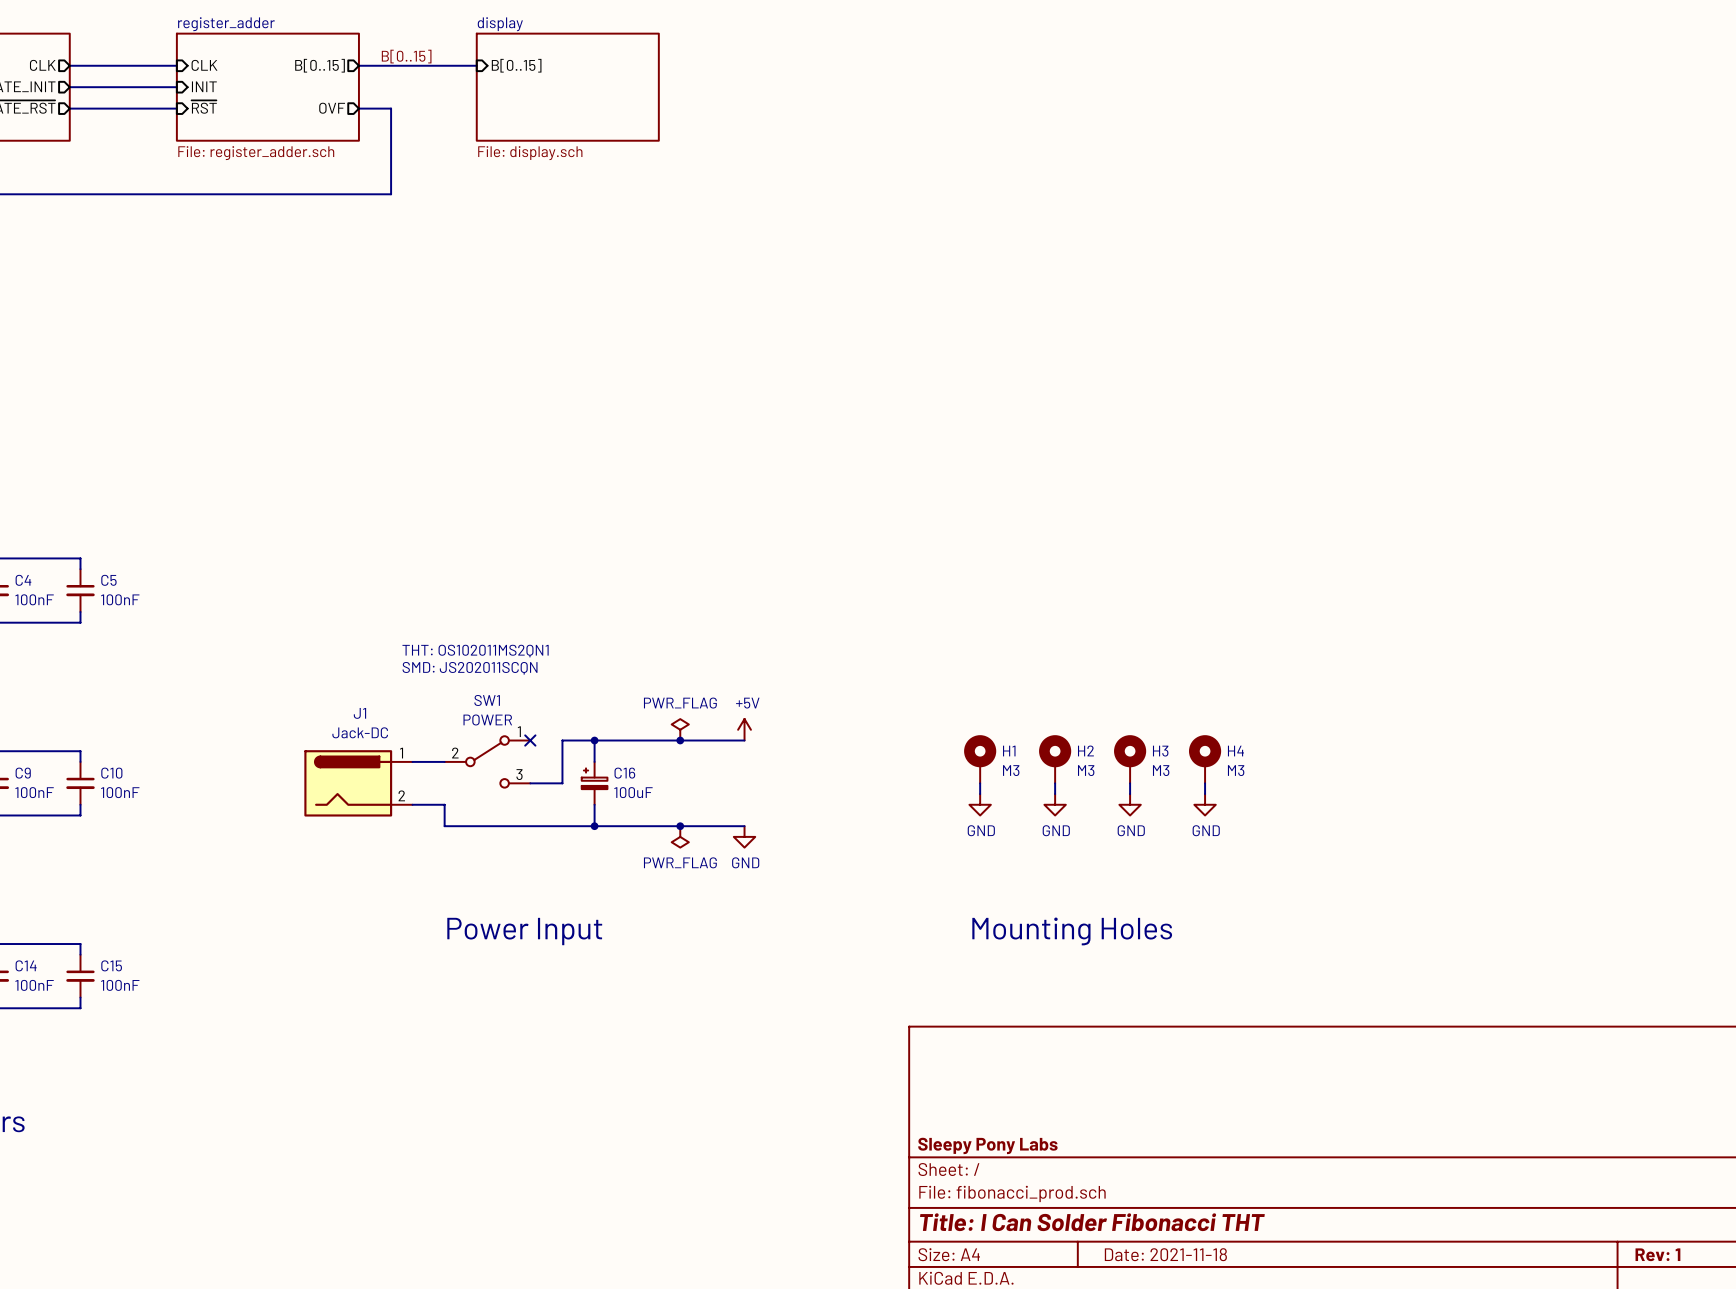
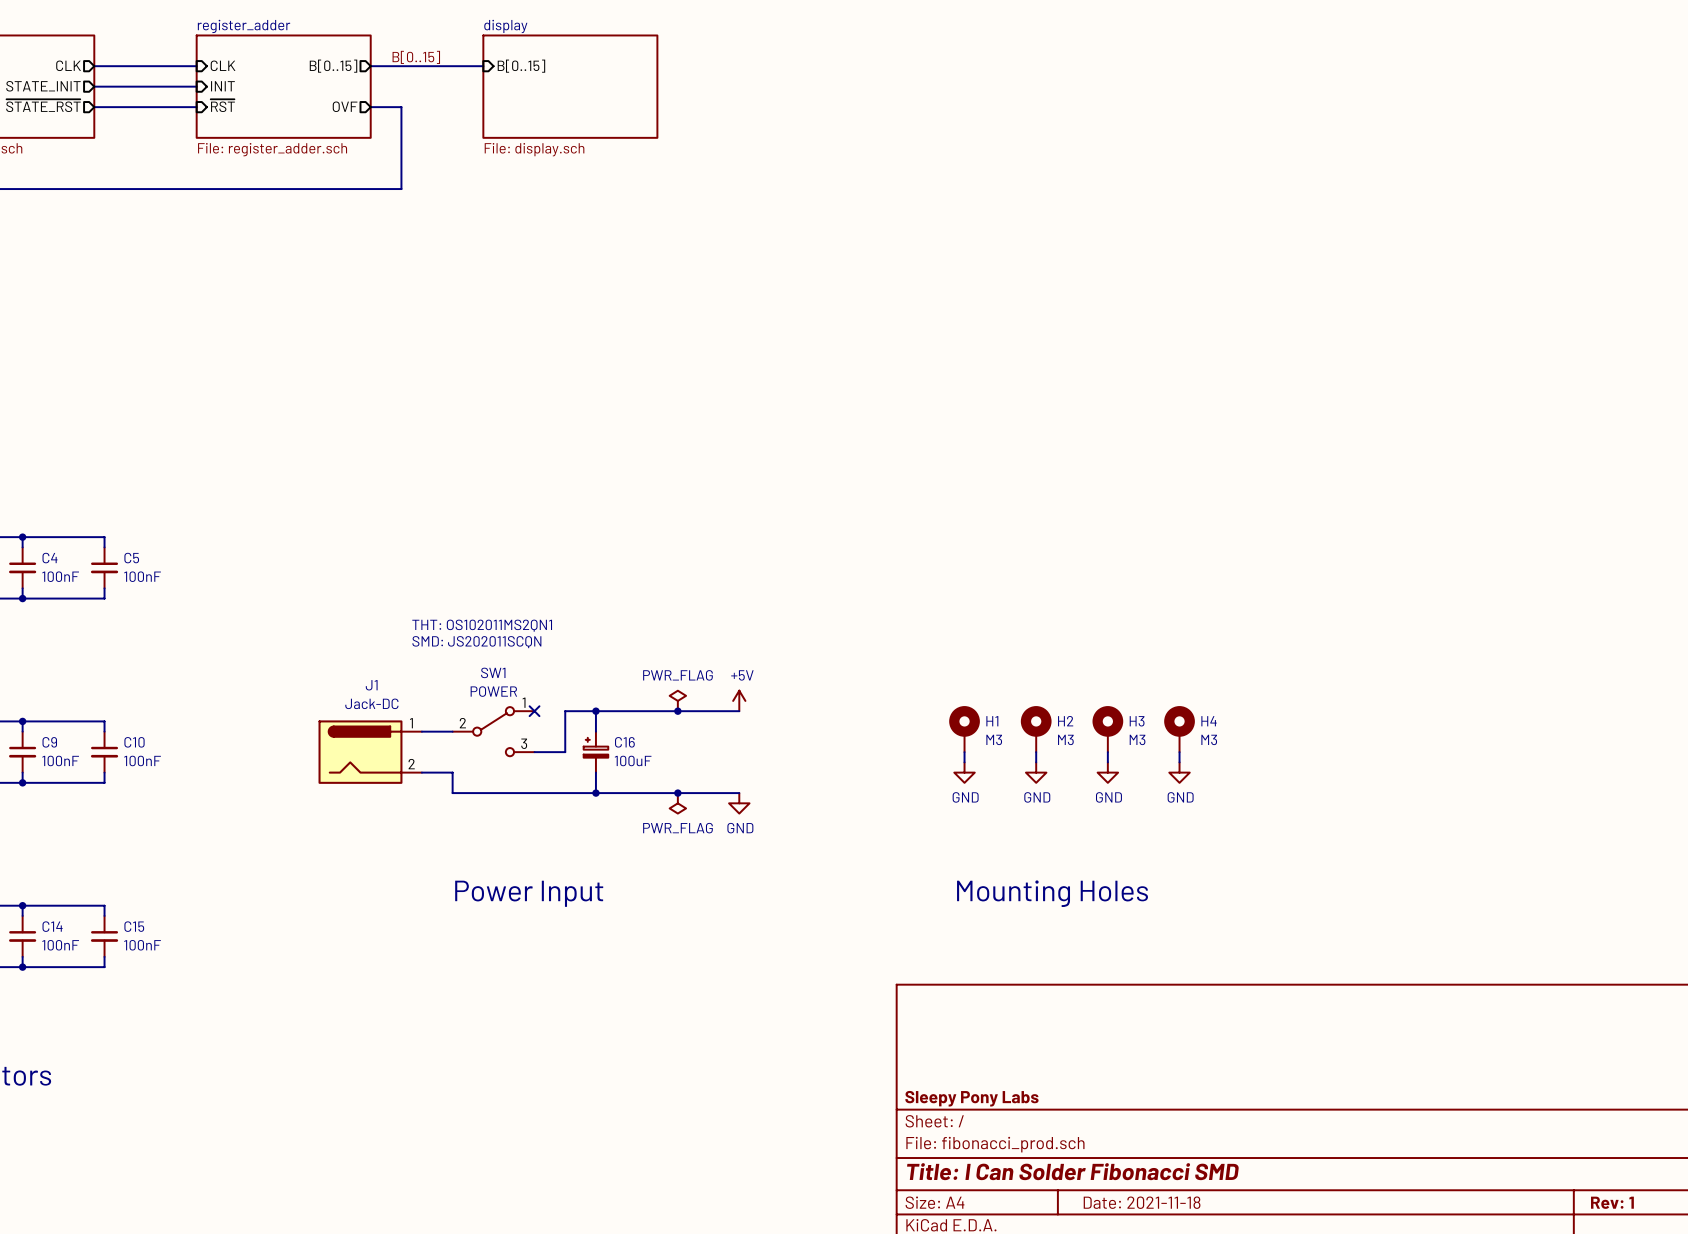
title block: Title: I Can Solder Fibonacci THT (1092, 1222) -> Title: I Can Solder Fibonacci SMD (1072, 1171)

